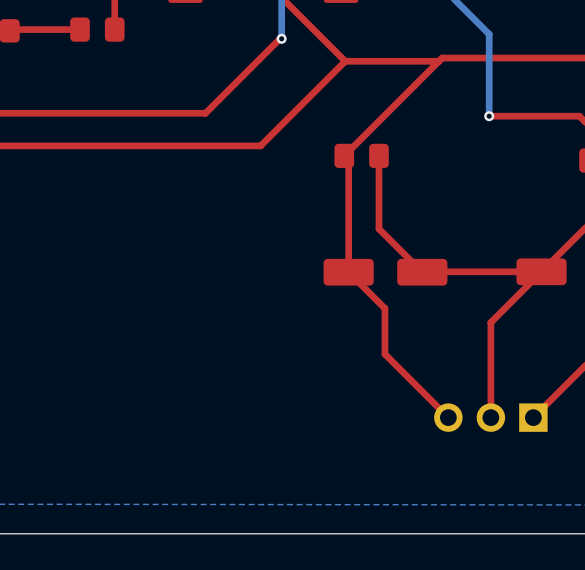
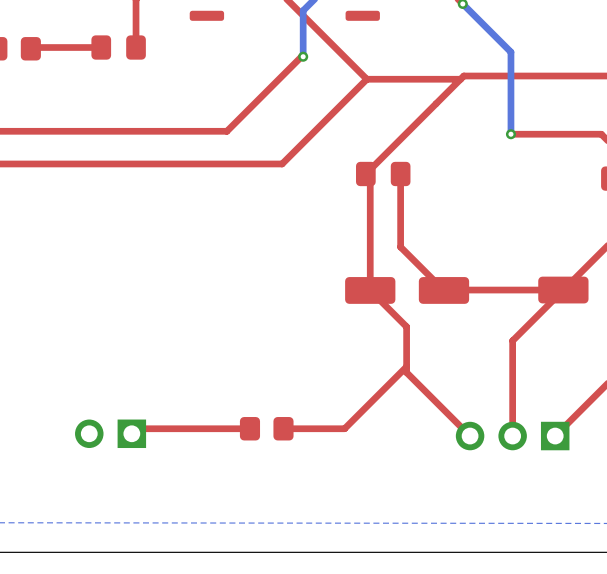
top track: none -> (406, 366) (344, 428) (283, 428)
top track: none -> (249, 428) (136, 428) (131, 433)
part: none -> (266, 428)
part: none -> (110, 433)

